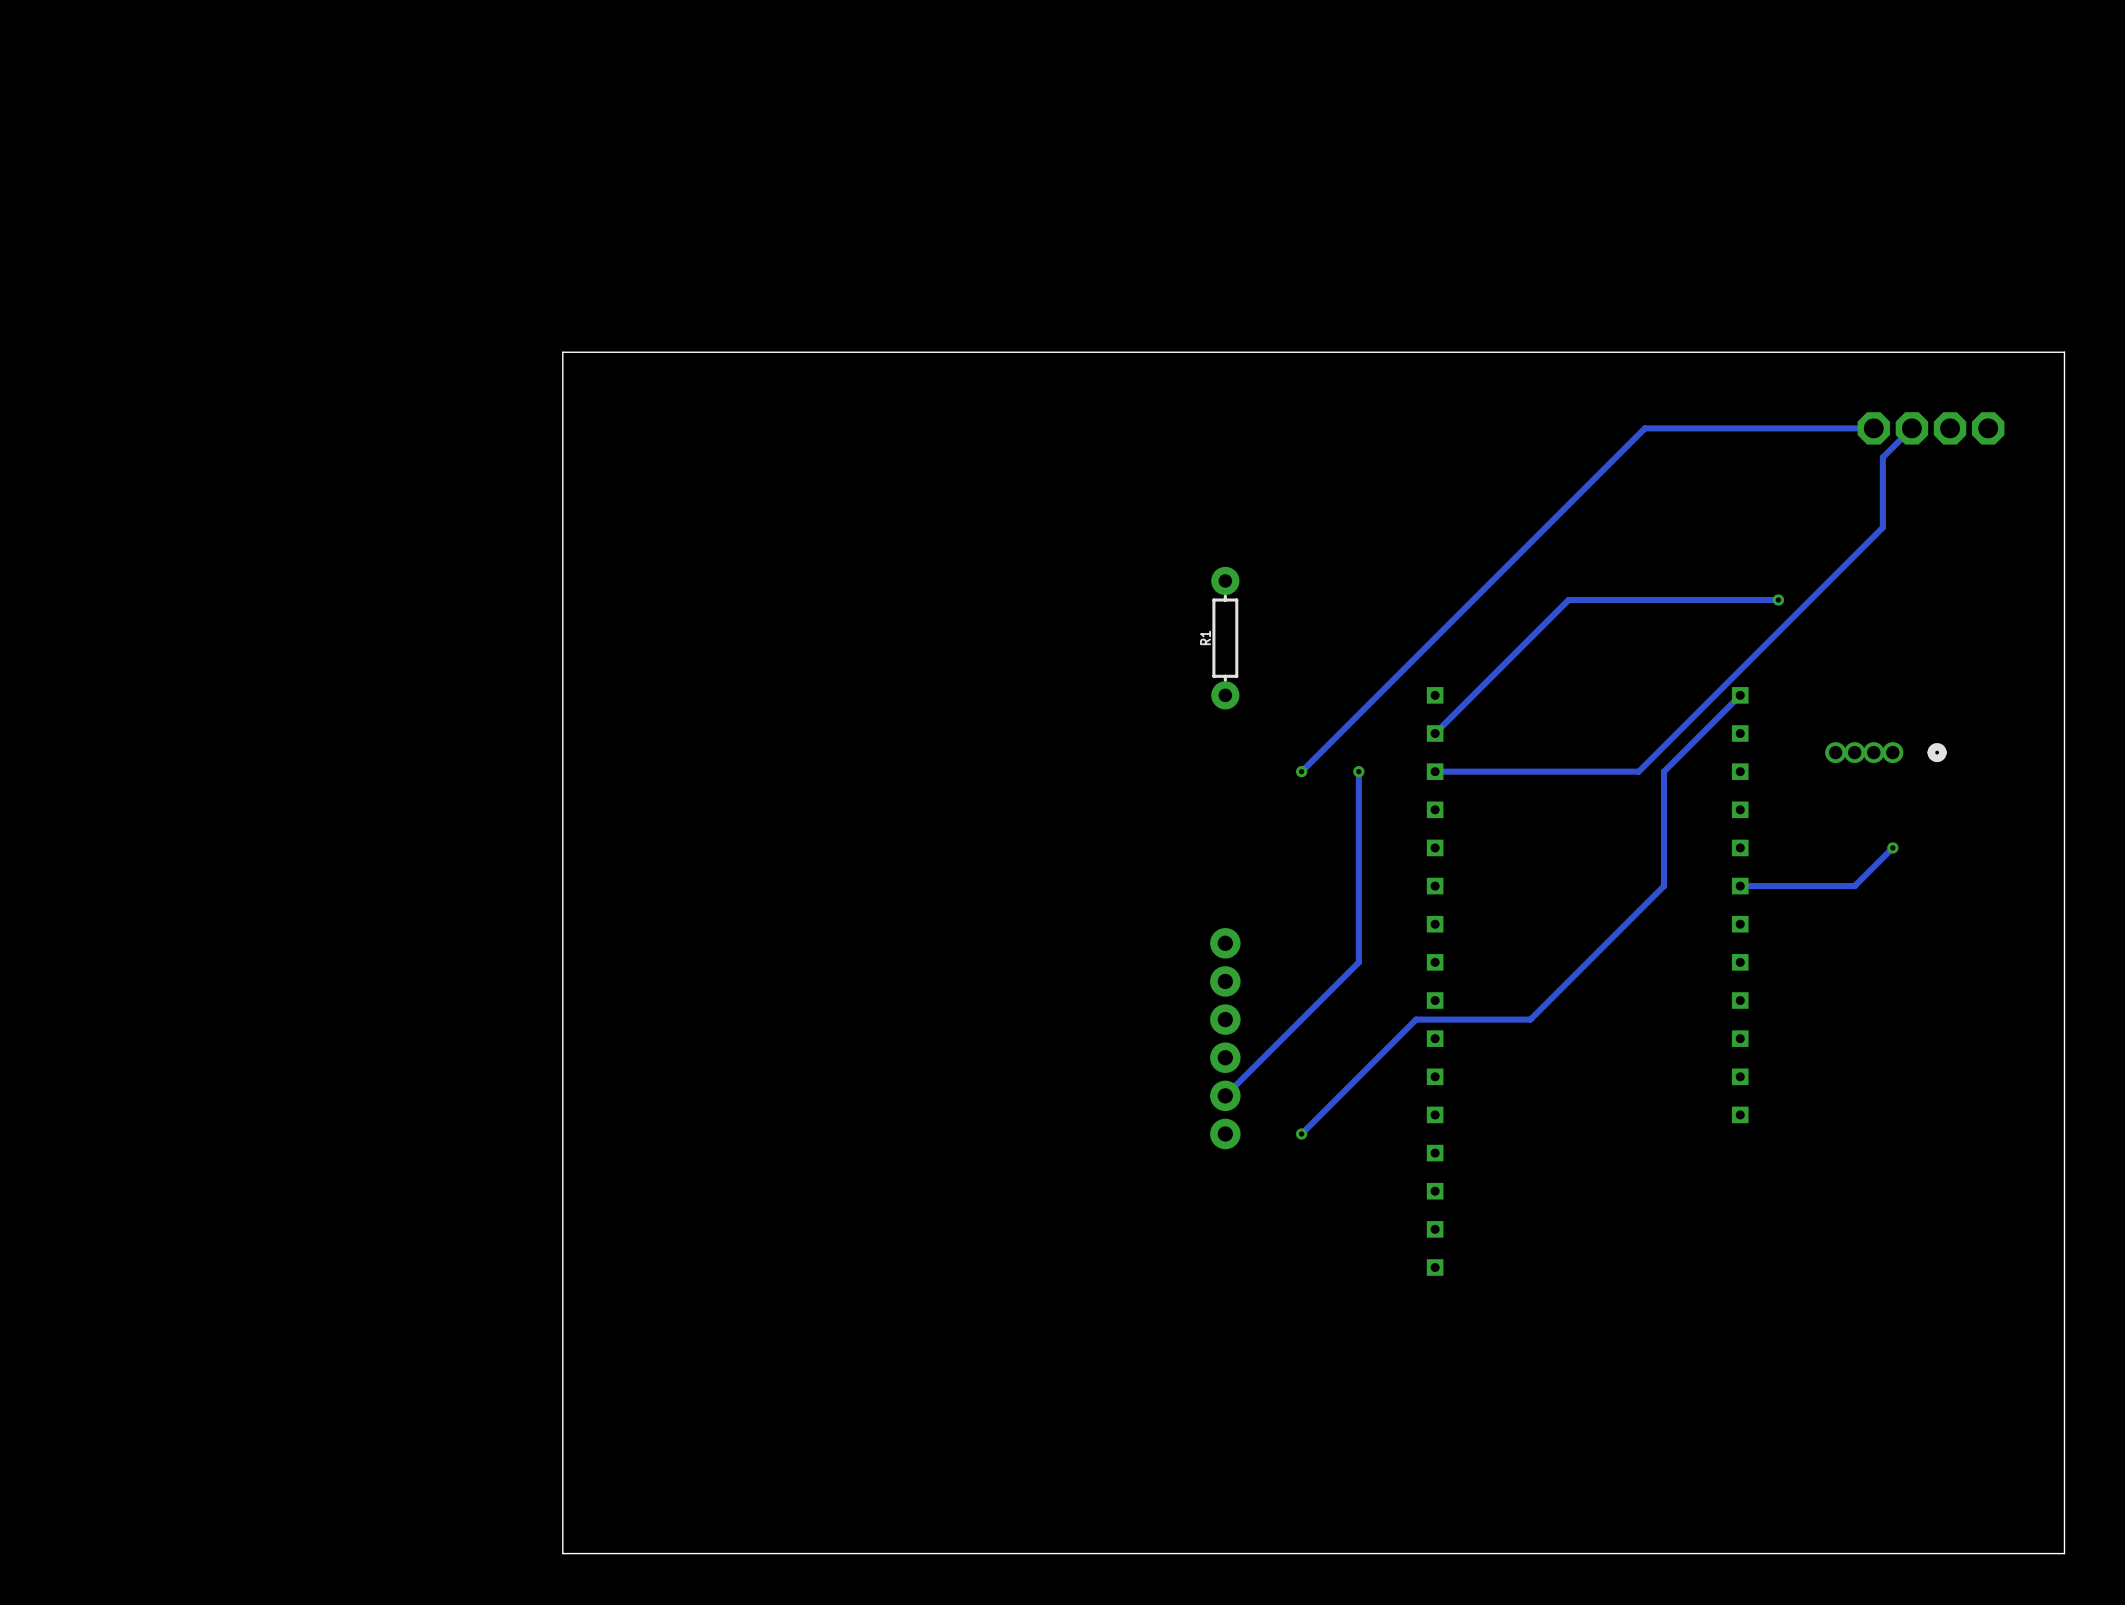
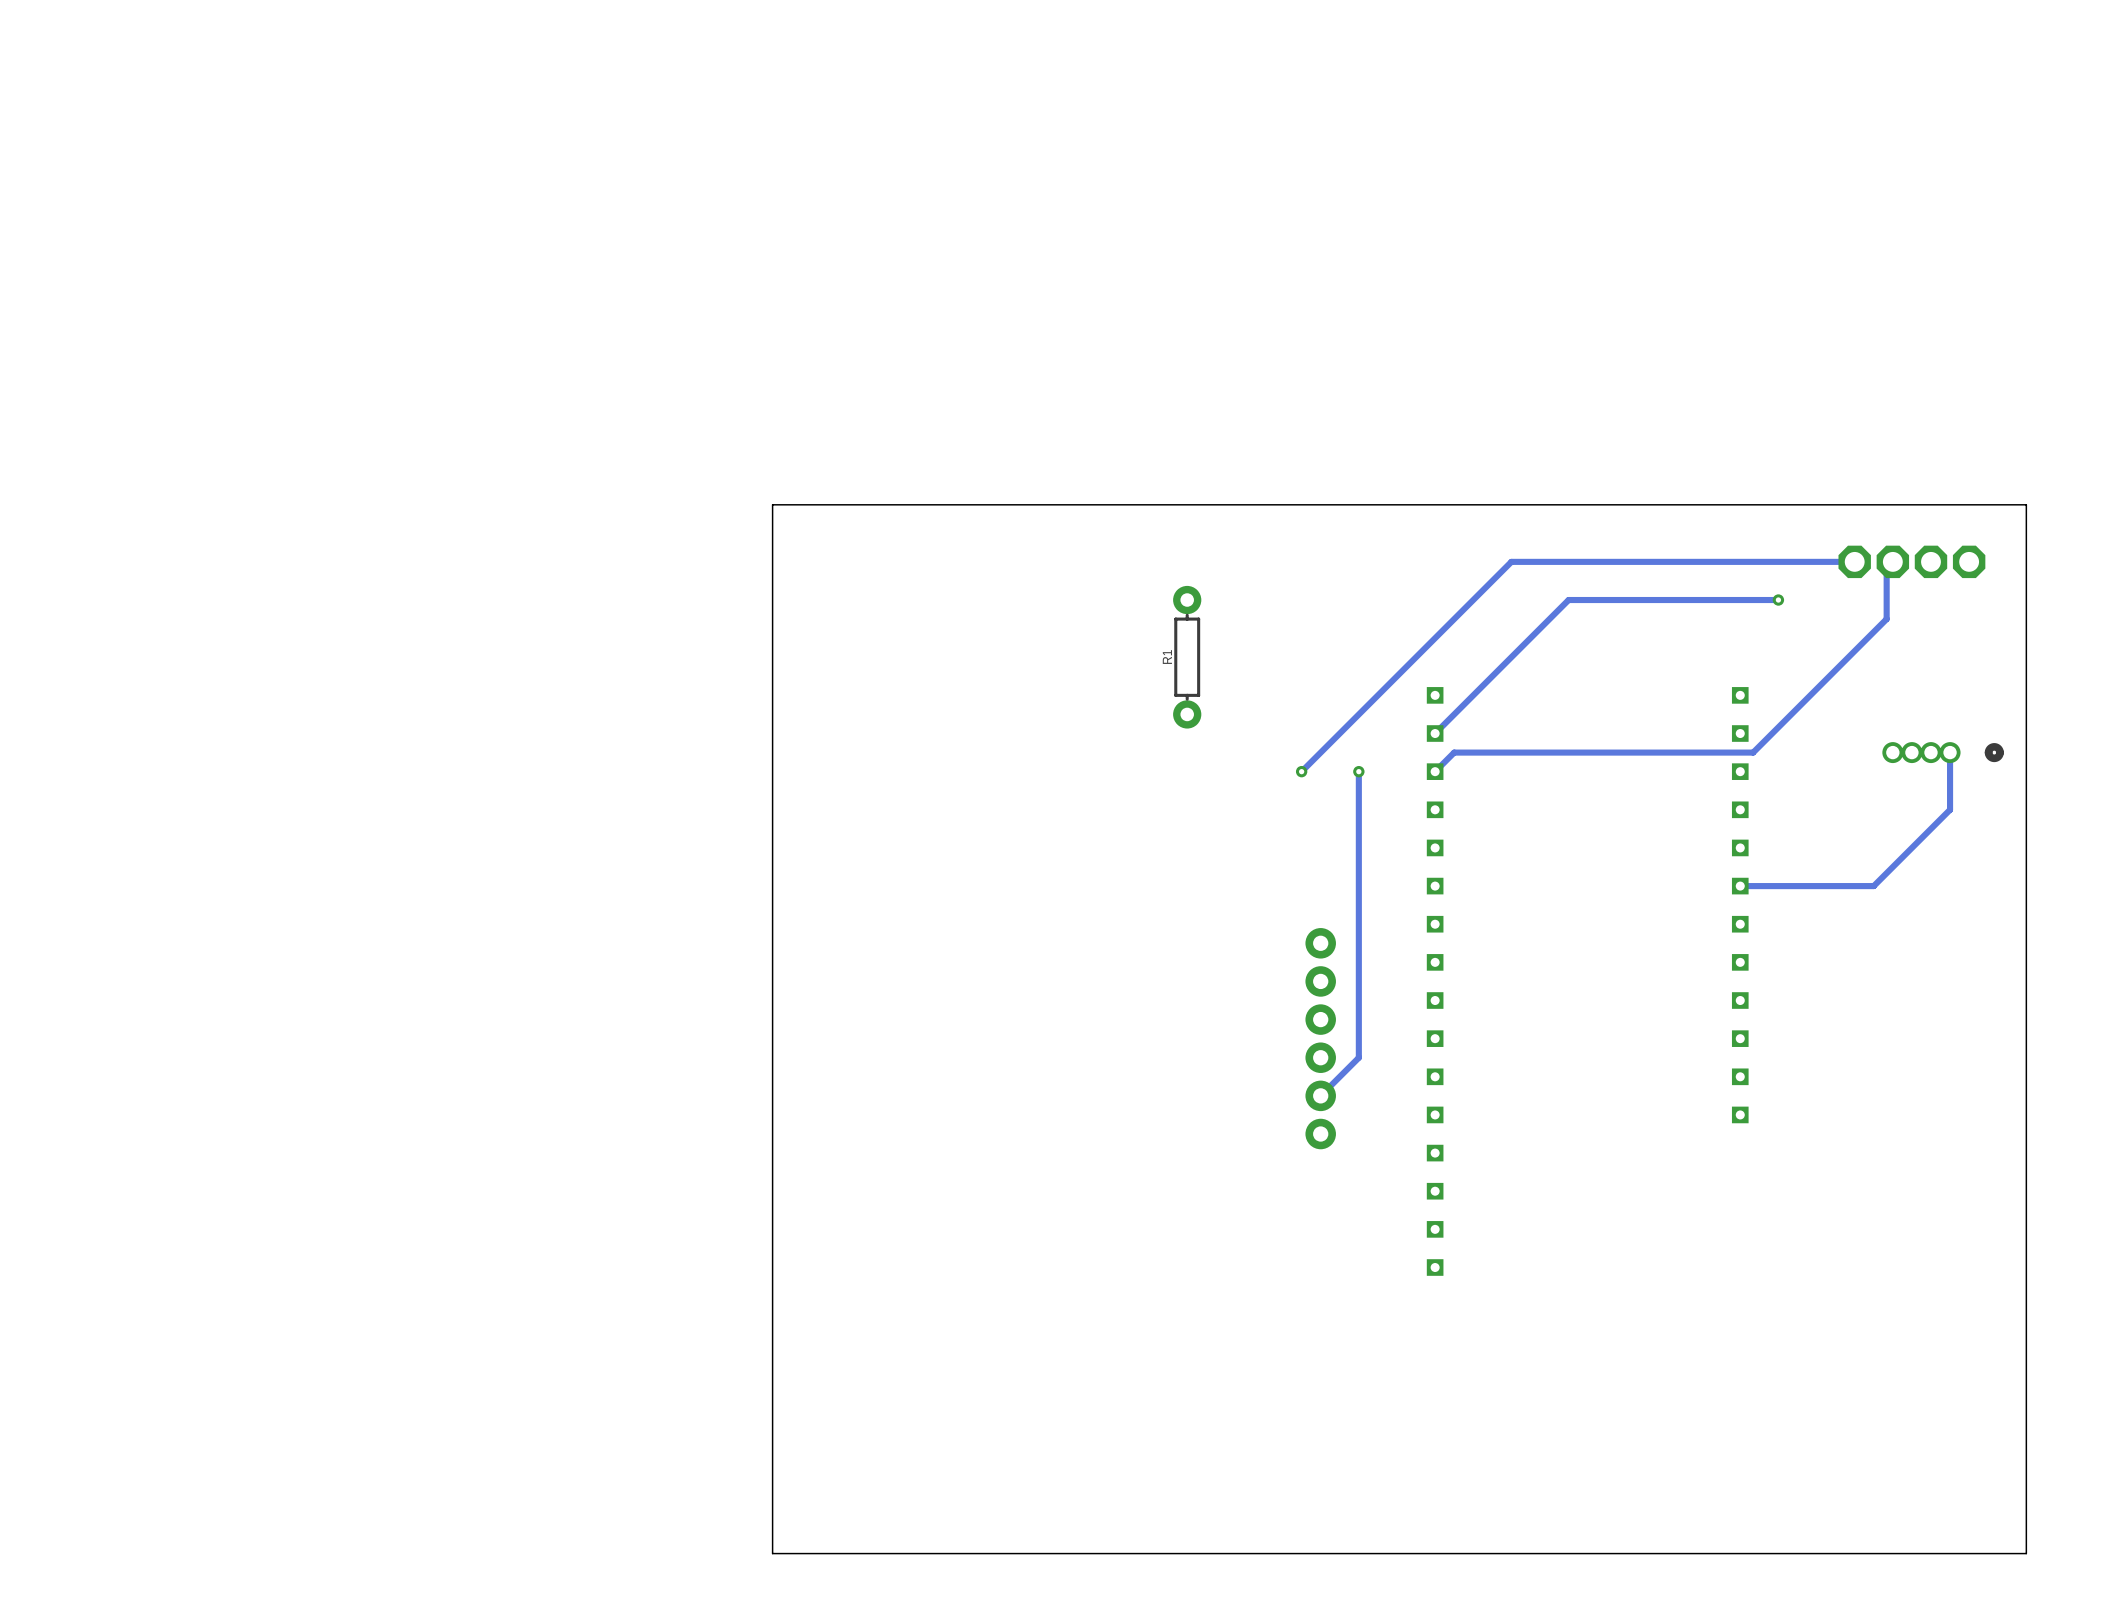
track: (1873, 428) (1644, 428) (1511, 561) -> (1854, 561) (1511, 561)
part: (1873, 428) -> none
track: (1911, 428) (1882, 457) (1882, 527) (1638, 771) (1435, 771) -> (1892, 561) (1886, 568) (1886, 619) (1753, 752) (1454, 752) (1435, 771)
part: (1911, 428) -> none
part: (1950, 428) -> none
part: (1988, 428) -> none
part: none -> (1854, 561)
part: none -> (1892, 561)
part: none -> (1930, 561)
part: none -> (1969, 561)
R1 position: (1225, 638) -> (1187, 657)
track: (1740, 695) (1663, 771) (1663, 886) (1530, 1019) (1416, 1019) (1301, 1134) -> none
part position: (1885, 752) -> (1943, 752)
track: (1892, 847) (1854, 886) -> (1950, 752) (1950, 809) (1873, 886) (1854, 886)
via: (1892, 847) -> none
track: (1358, 962) (1225, 1095) -> (1358, 962) (1358, 1057) (1320, 1095)
part position: (1225, 1038) -> (1320, 1038)
via: (1301, 1134) -> none
board edge: (2026, 1553) (2064, 1553) (2064, 352) (562, 352) (562, 1553) (772, 1553) -> (2026, 1553) (2026, 504) (772, 504) (772, 1553)

